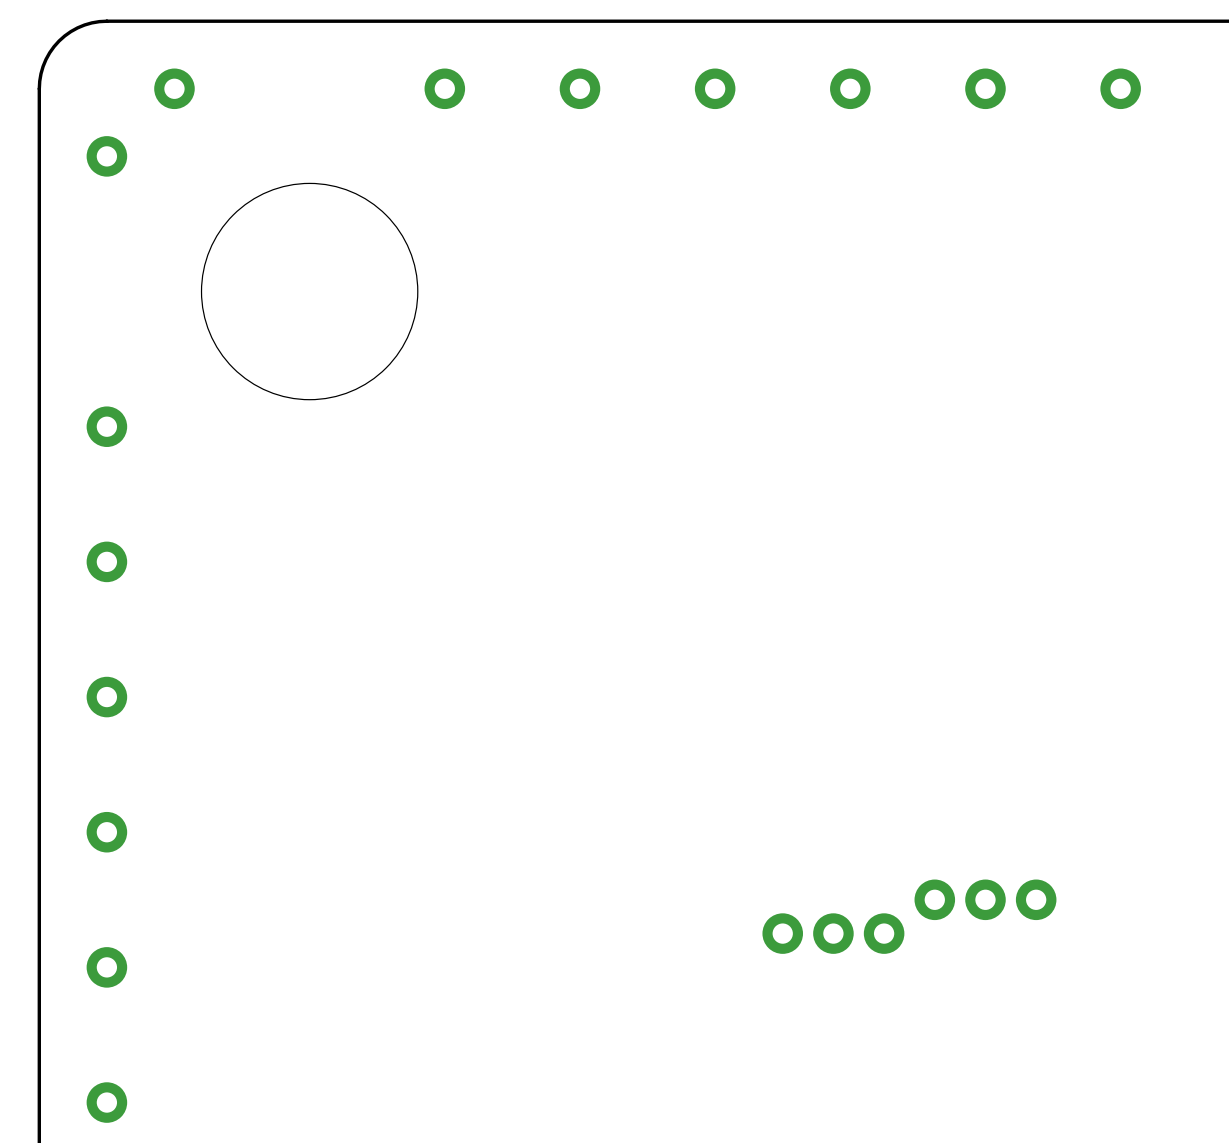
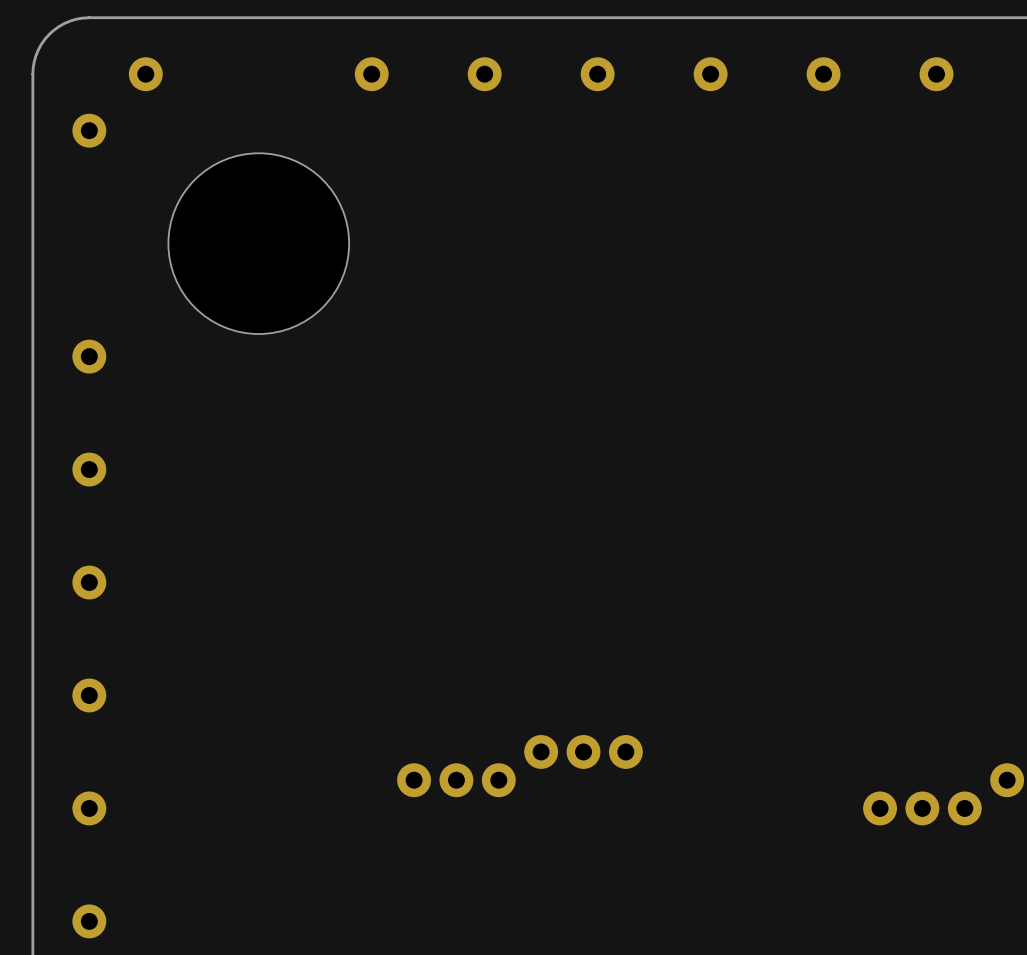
via: none -> (541, 751)
via: none -> (583, 751)
via: (934, 899) -> none
via: (985, 899) -> none
via: (1036, 899) -> none
via: none -> (414, 780)
via: none -> (456, 780)
via: none -> (498, 780)
via position: (782, 933) -> (625, 751)
via: (833, 933) -> none
via: (884, 933) -> none
via: none -> (1007, 780)
via: none -> (880, 808)
via: none -> (922, 808)
via: none -> (964, 808)

